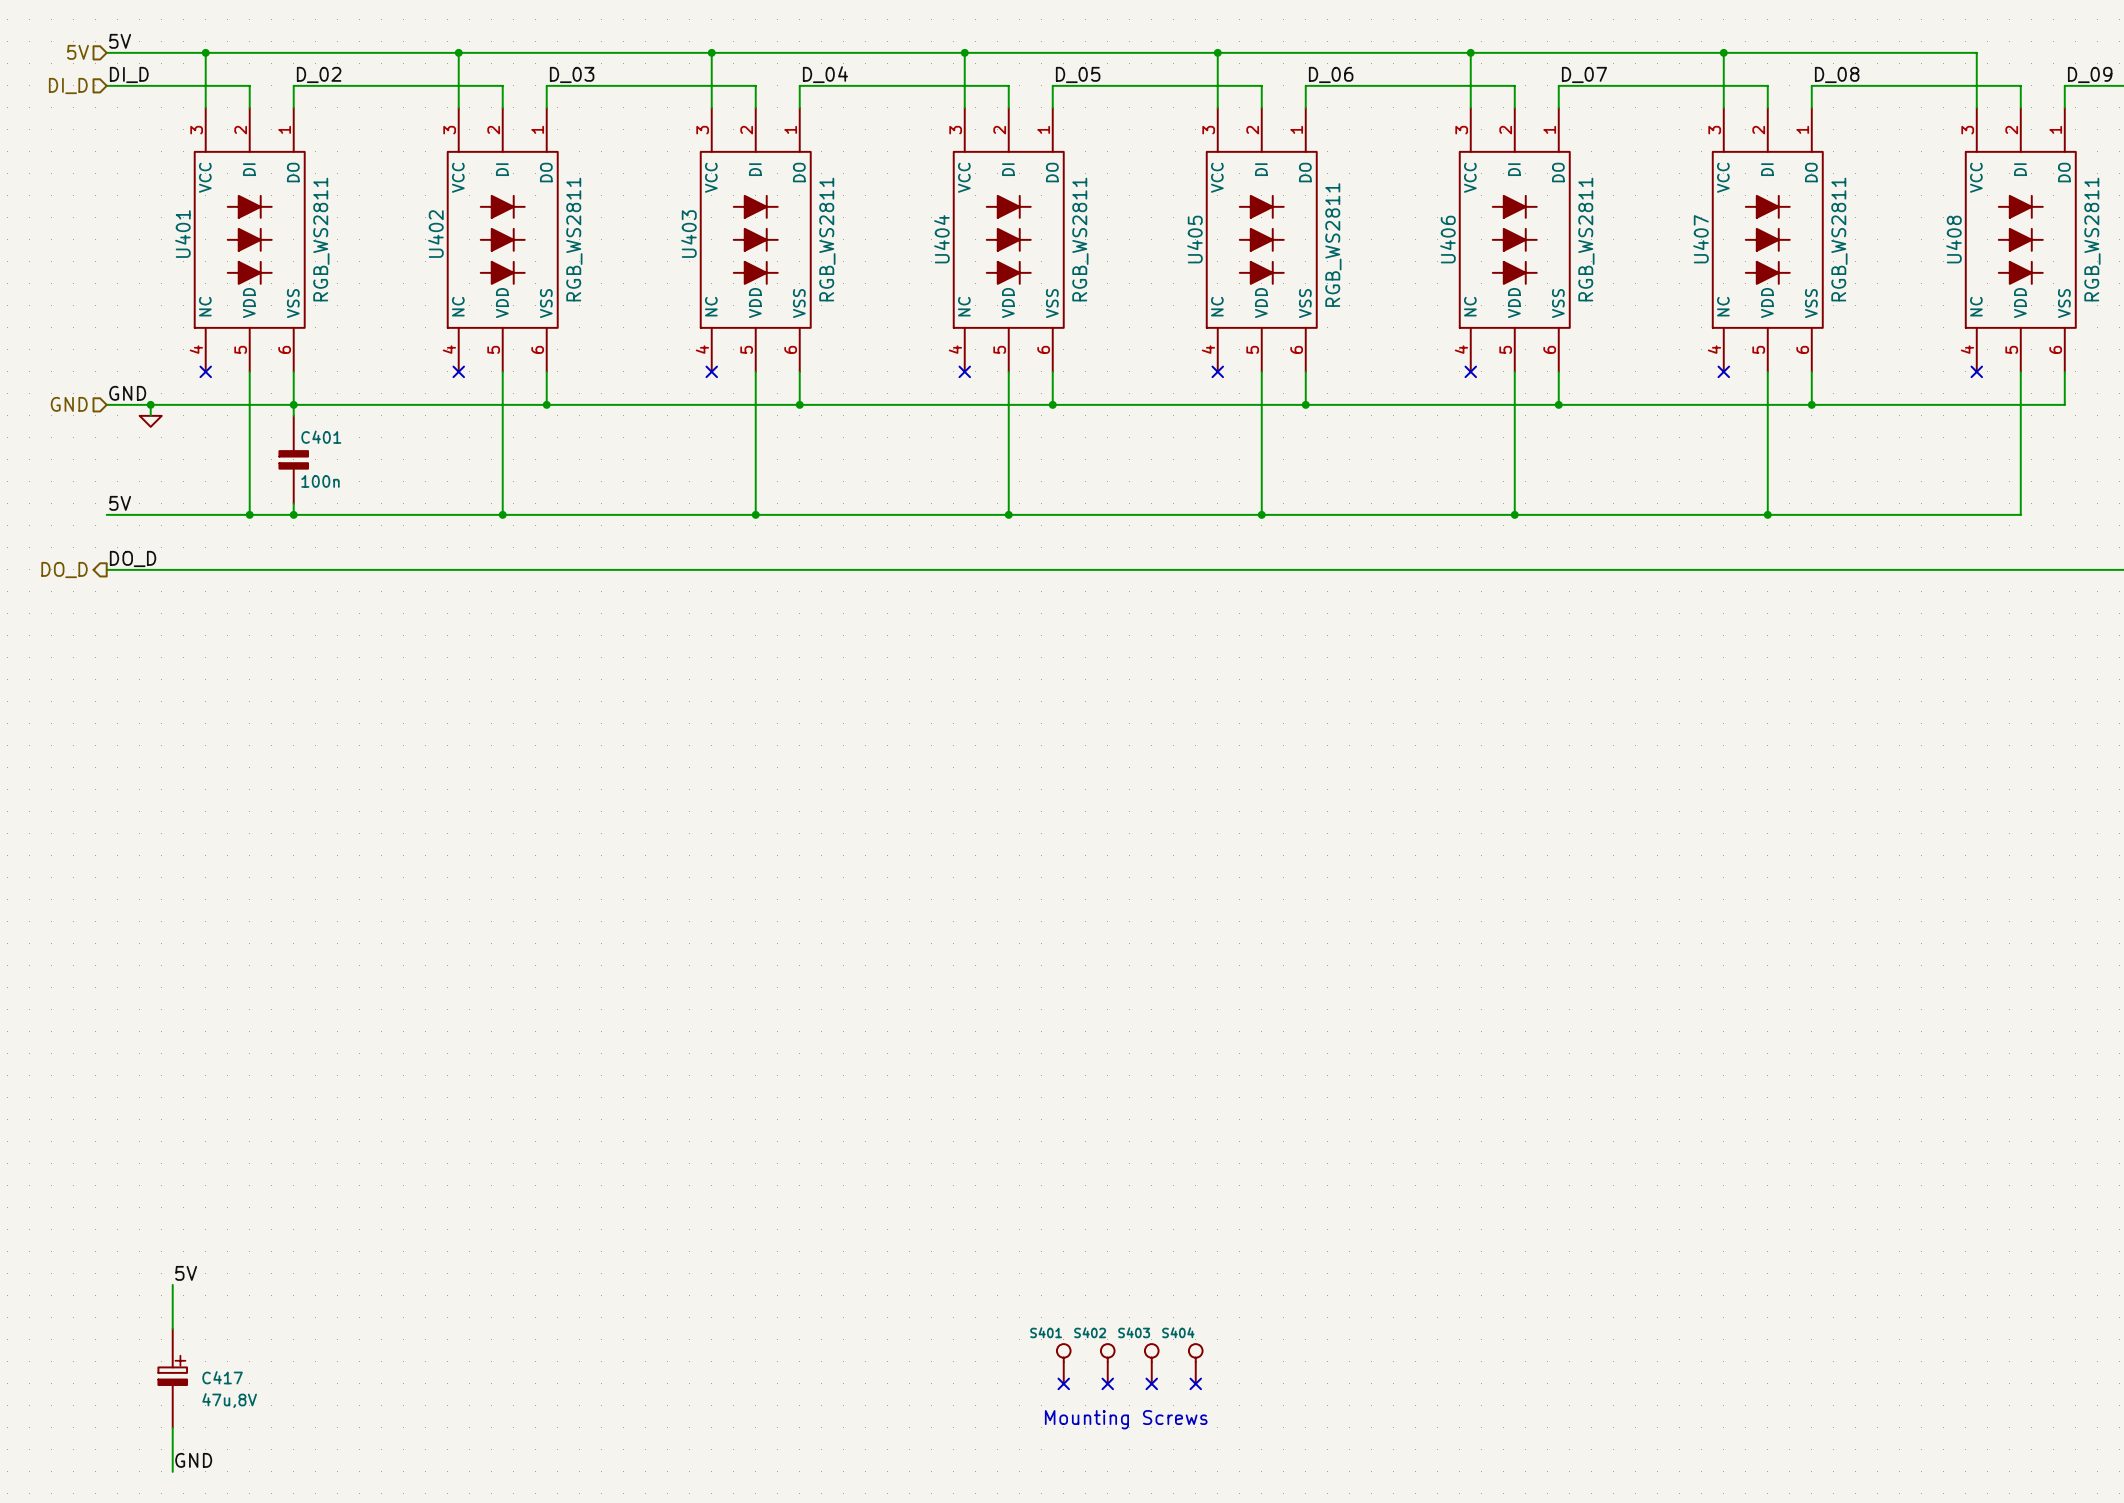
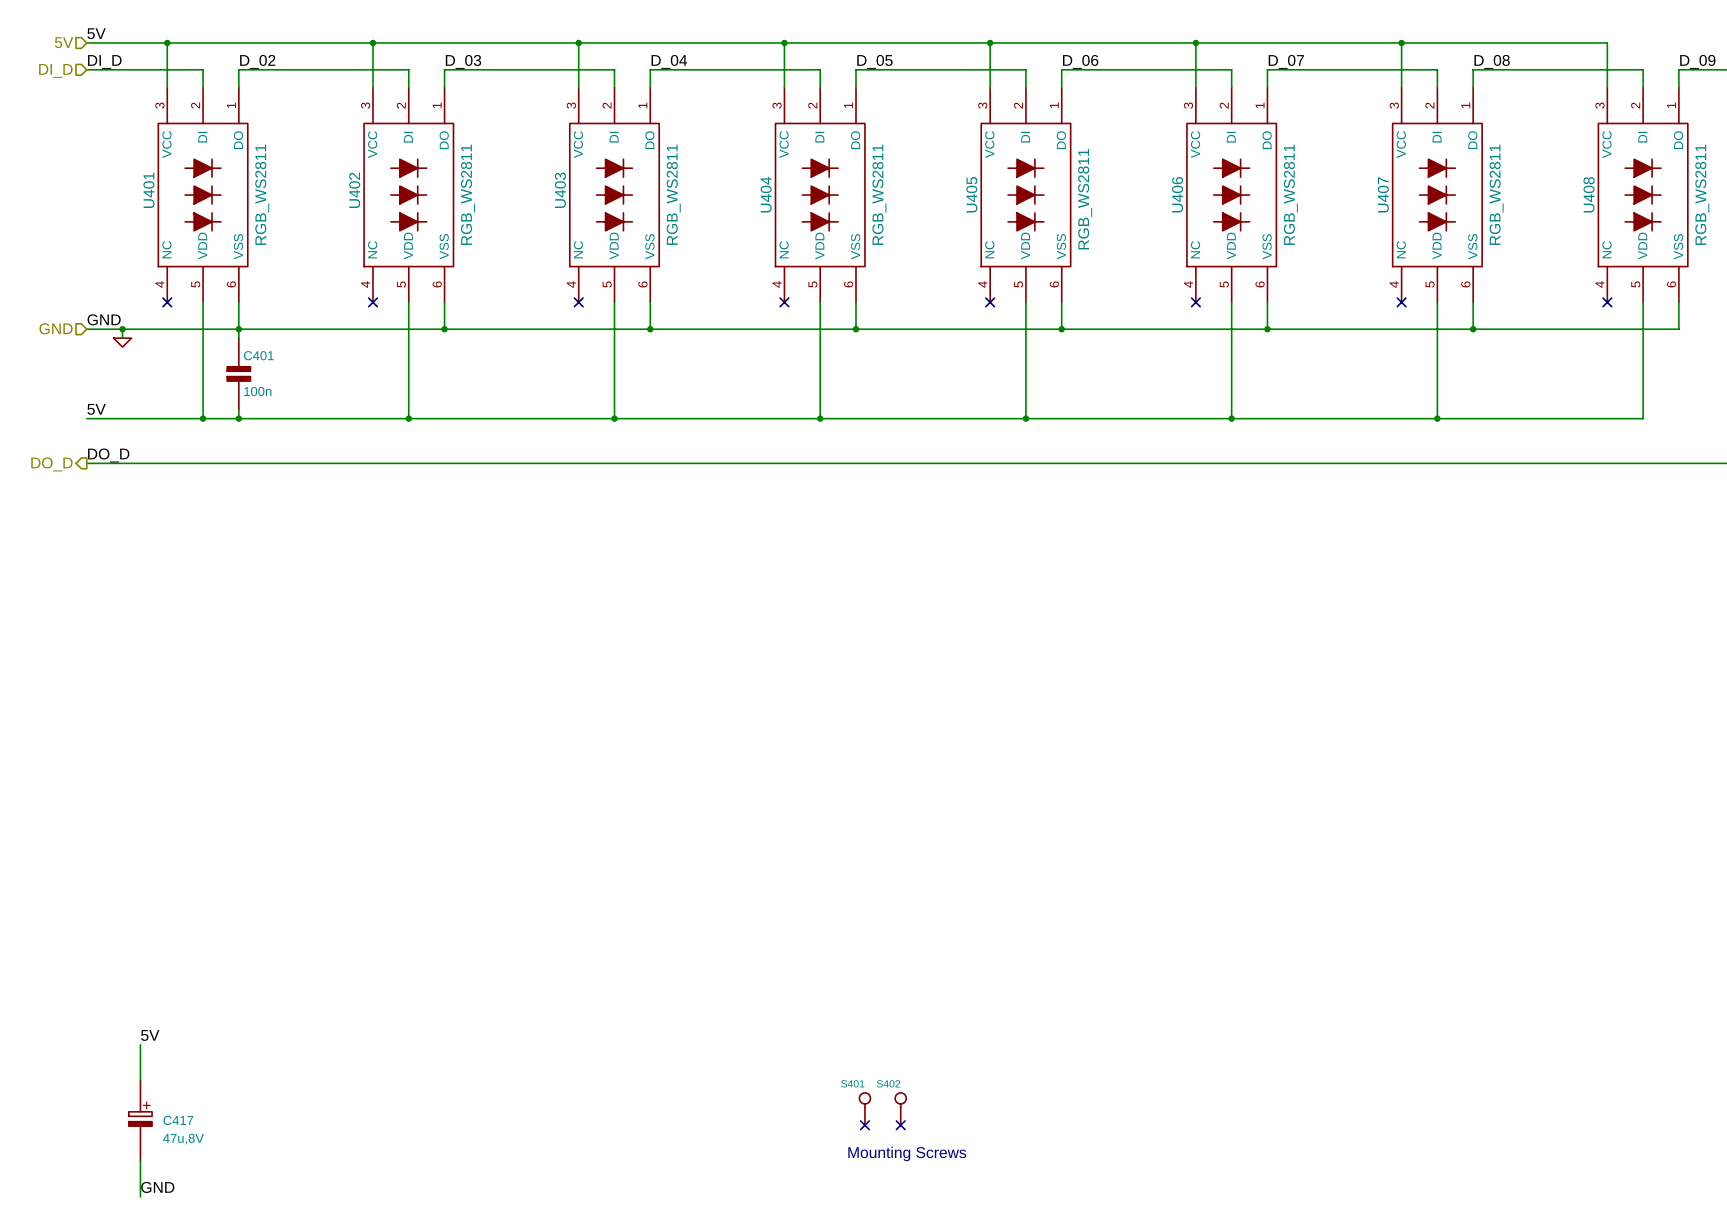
S403: (1151, 1363) -> none
S404: (1195, 1363) -> none
no-connect mark: (1151, 1383) -> none
no-connect mark: (1195, 1383) -> none

